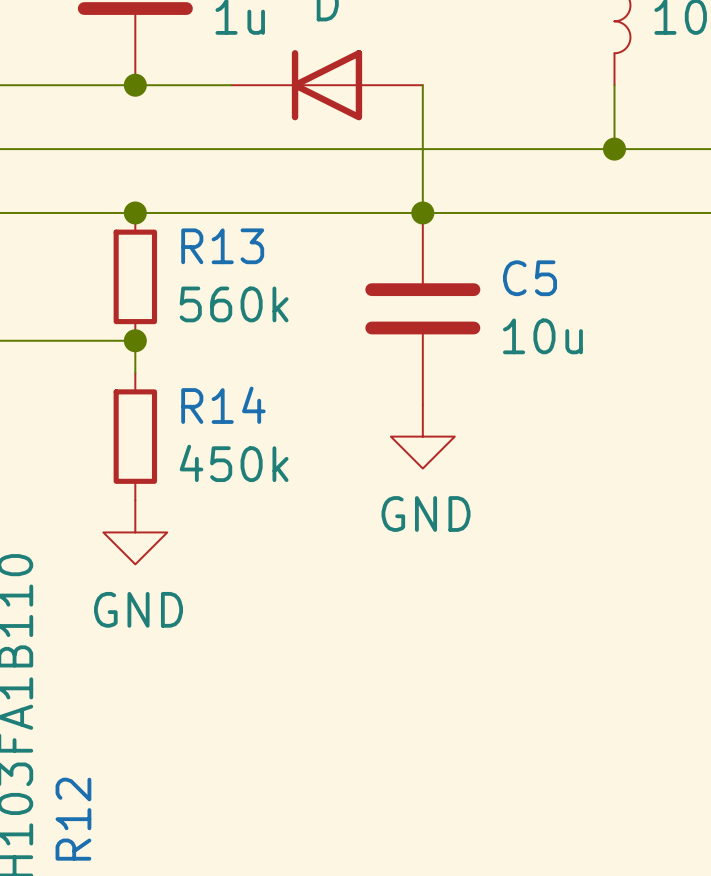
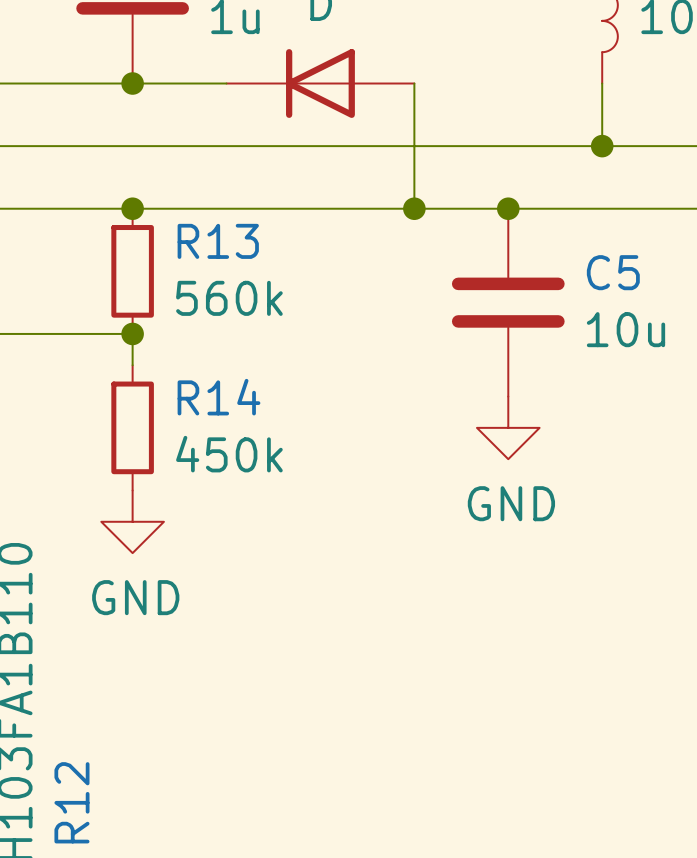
junction: none -> (508, 208)
C5 position: (422, 308) -> (508, 302)
power symbol position: GND (422, 436) -> GND (508, 427)

